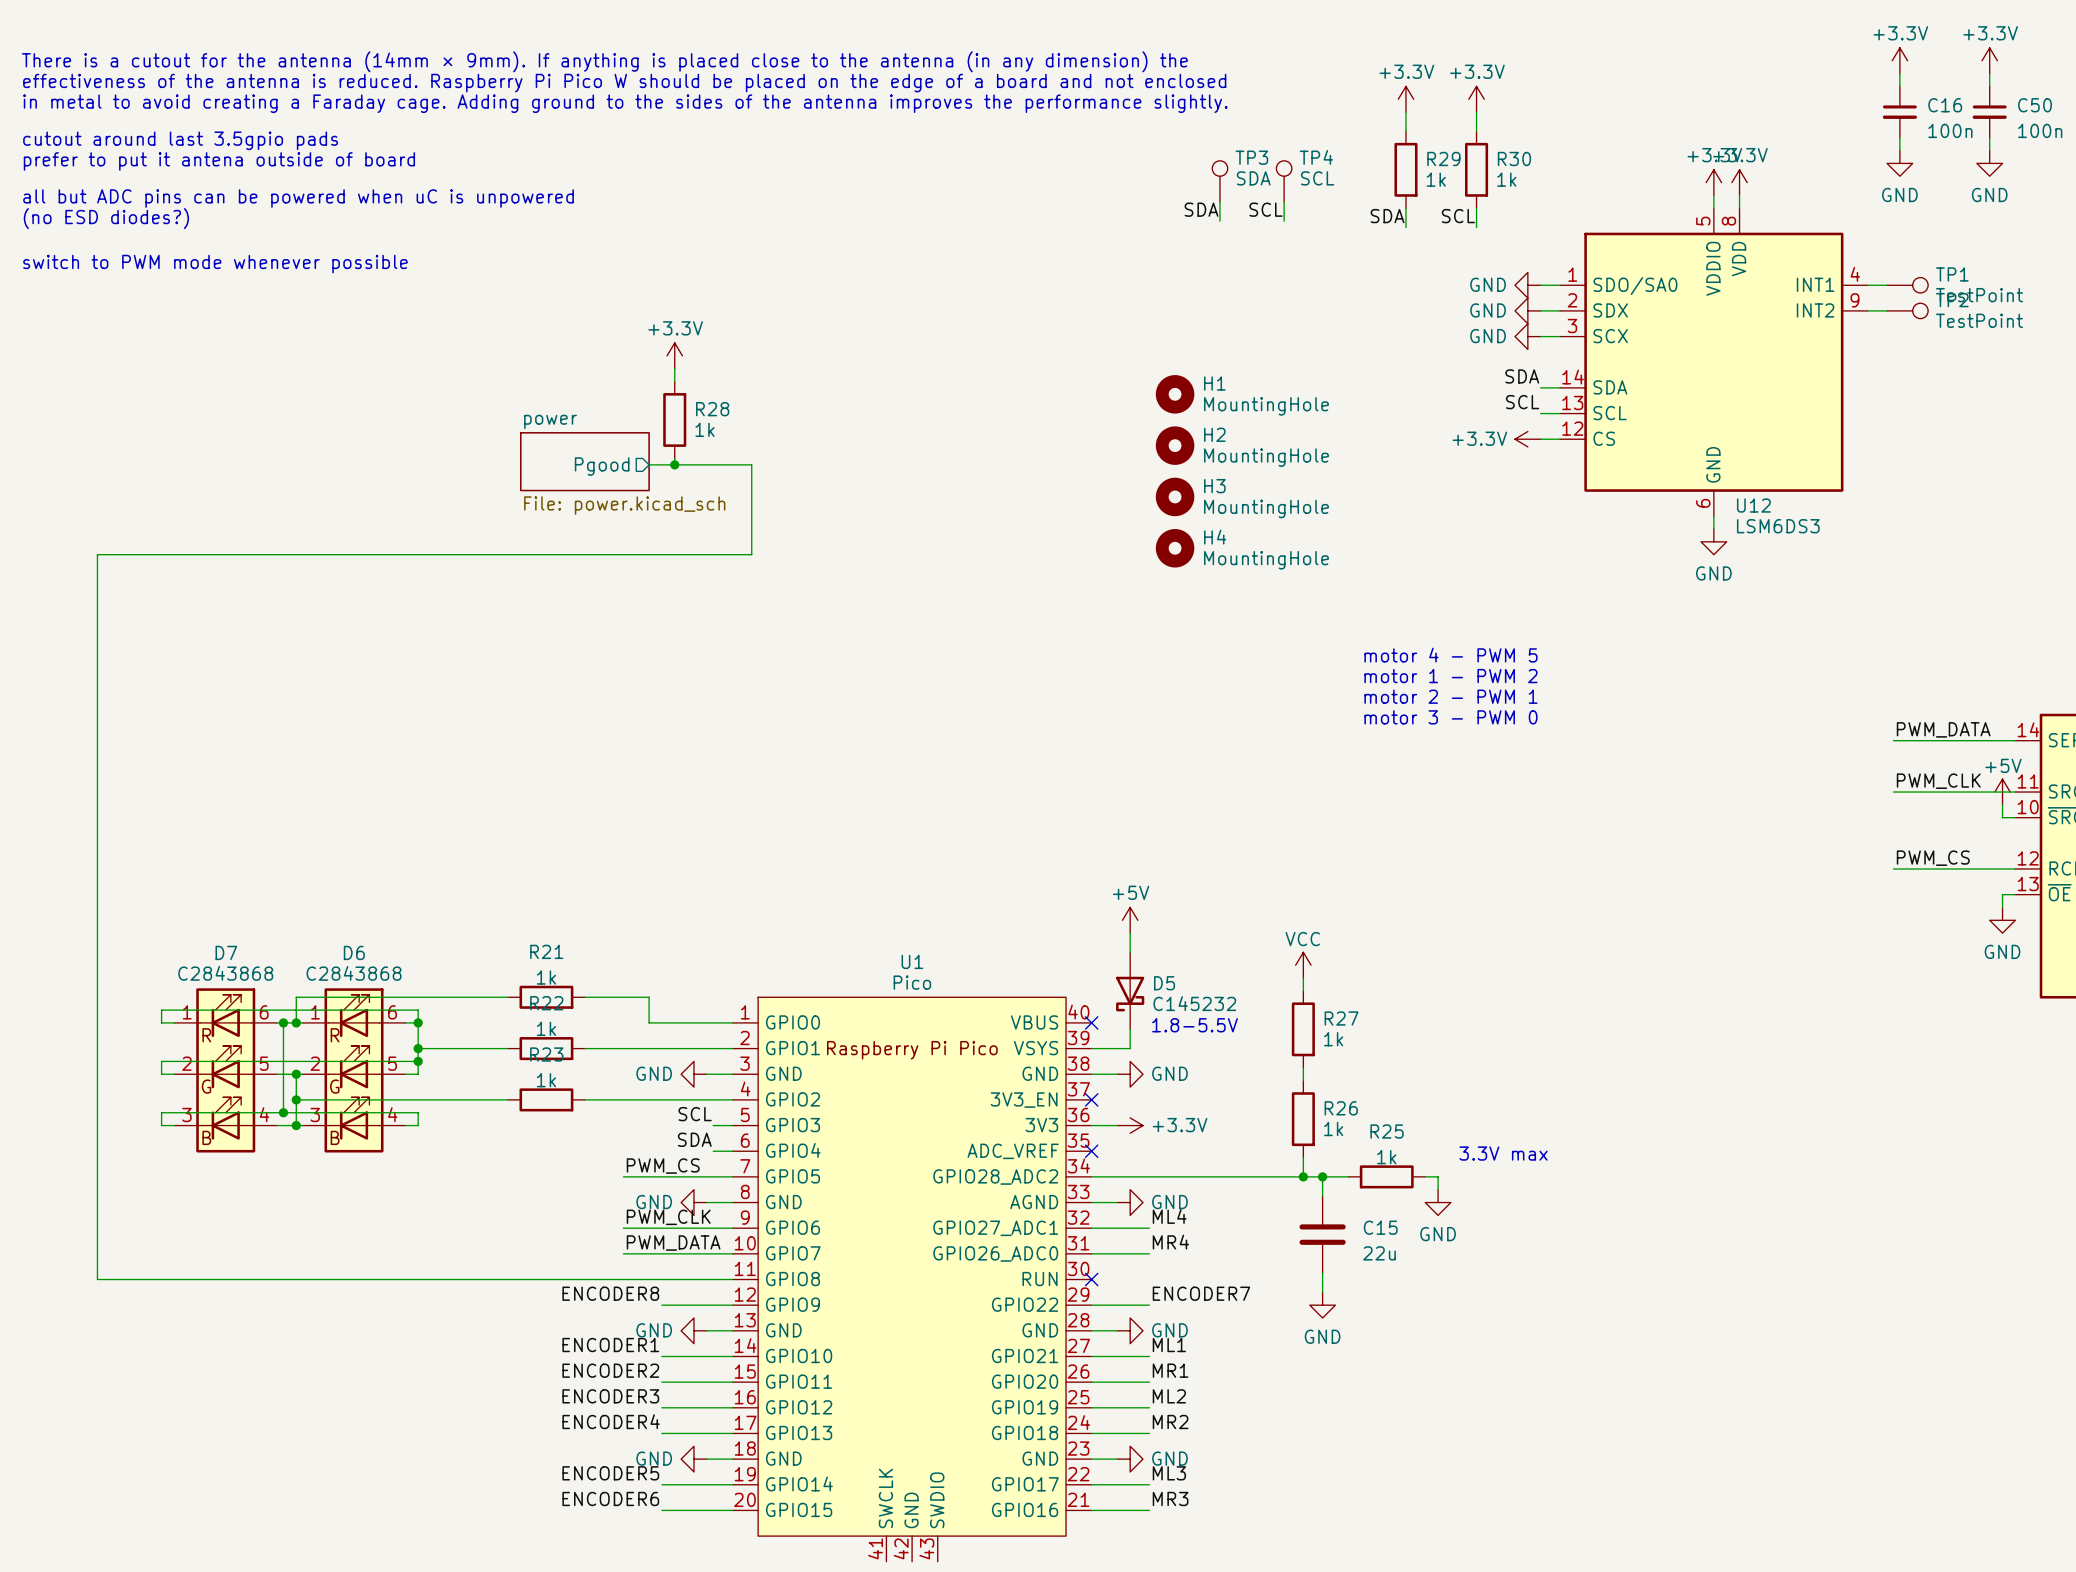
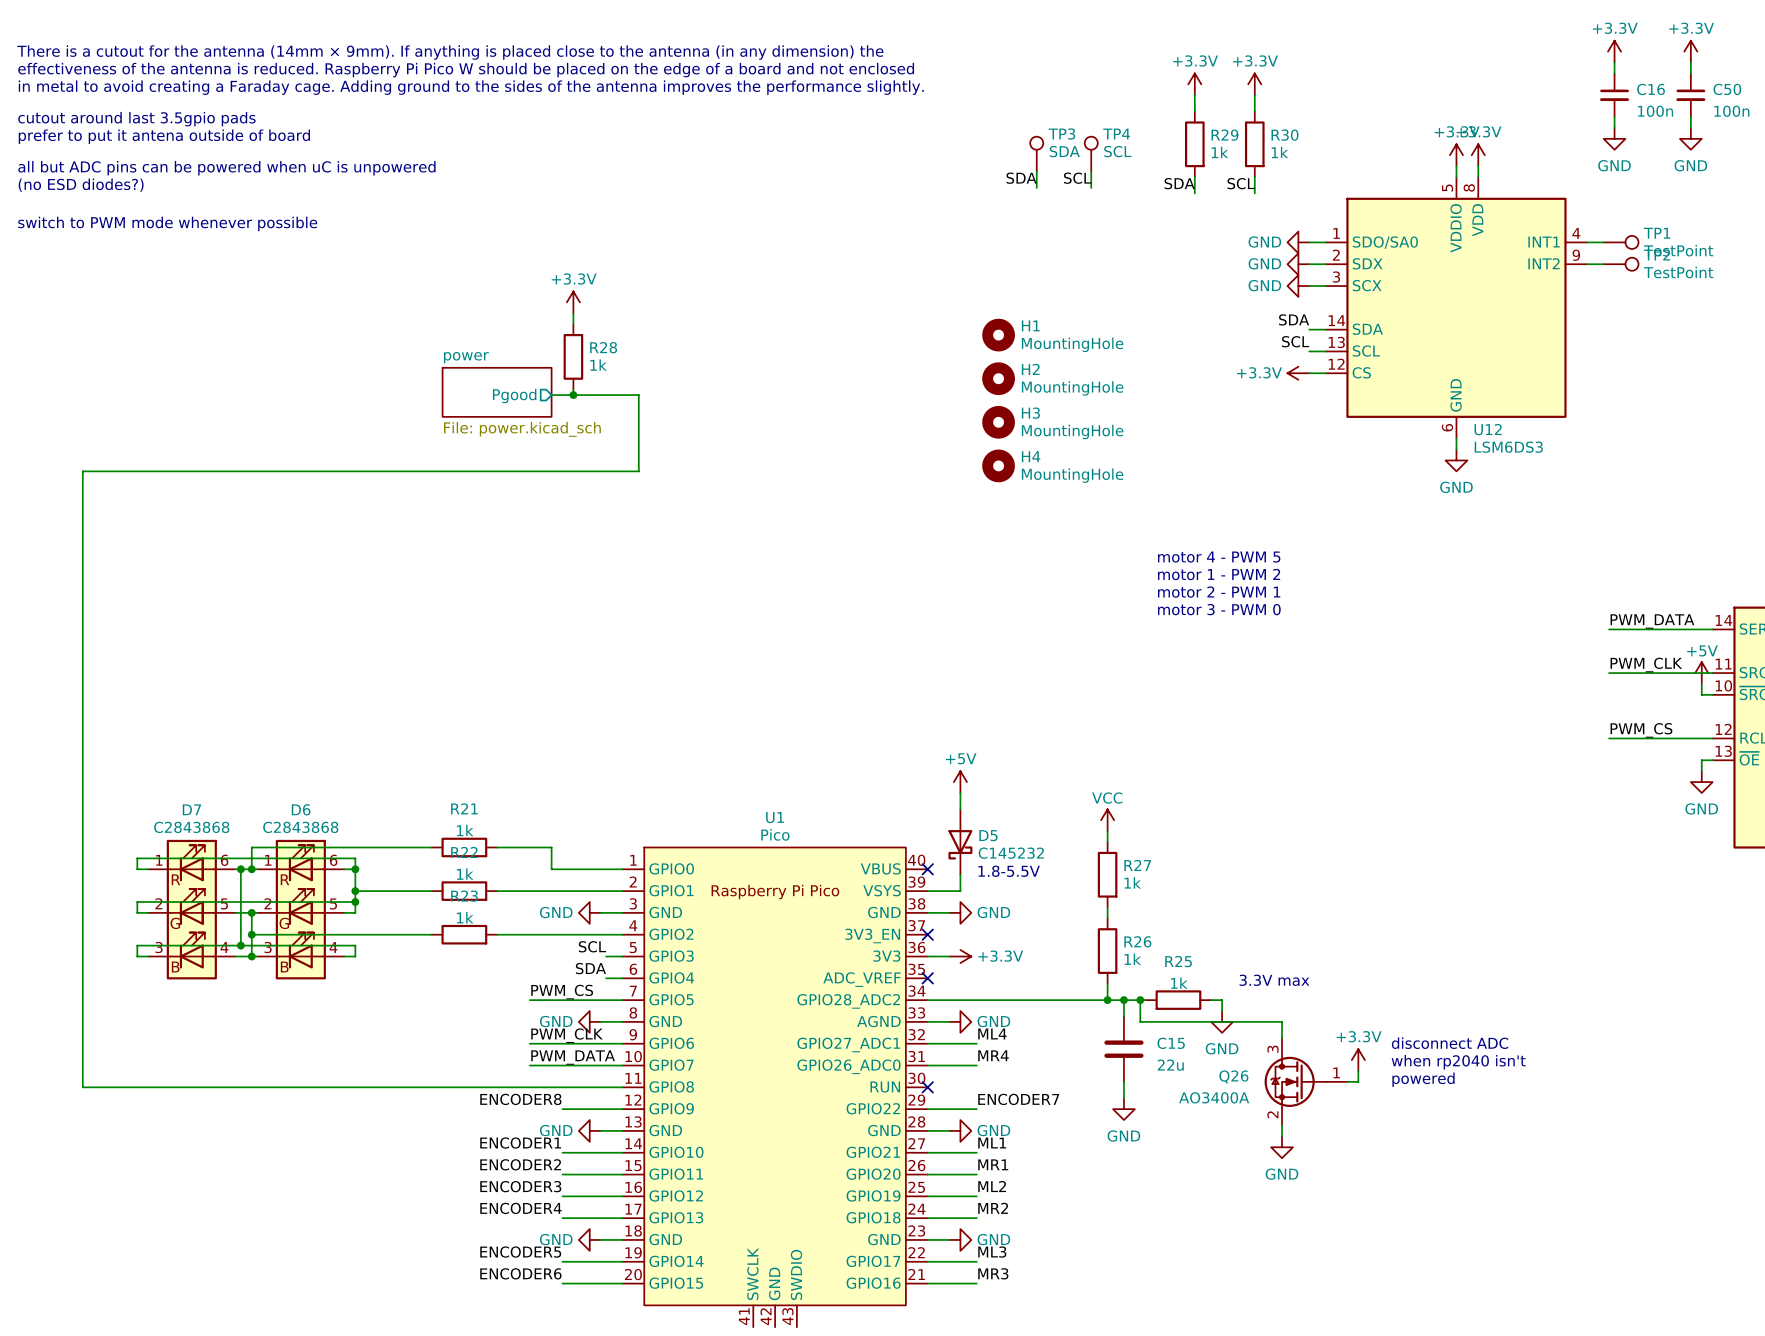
wire: none -> (1140, 1000) (1140, 1021) (1282, 1021) (1282, 1038)
junction: none -> (1140, 1000)
text: none -> disconnect ADC (1450, 1043)
power symbol: none -> +3.3V (1358, 1060)
text: none -> when rp2040 isn't (1458, 1062)
wire: none -> (1358, 1070) (1358, 1081) (1347, 1081)
text: none -> powered (1423, 1079)
Q26: none -> AO3400A (1306, 1081)
wire: none -> (1282, 1125) (1282, 1136)
power symbol: none -> GND (1282, 1147)

